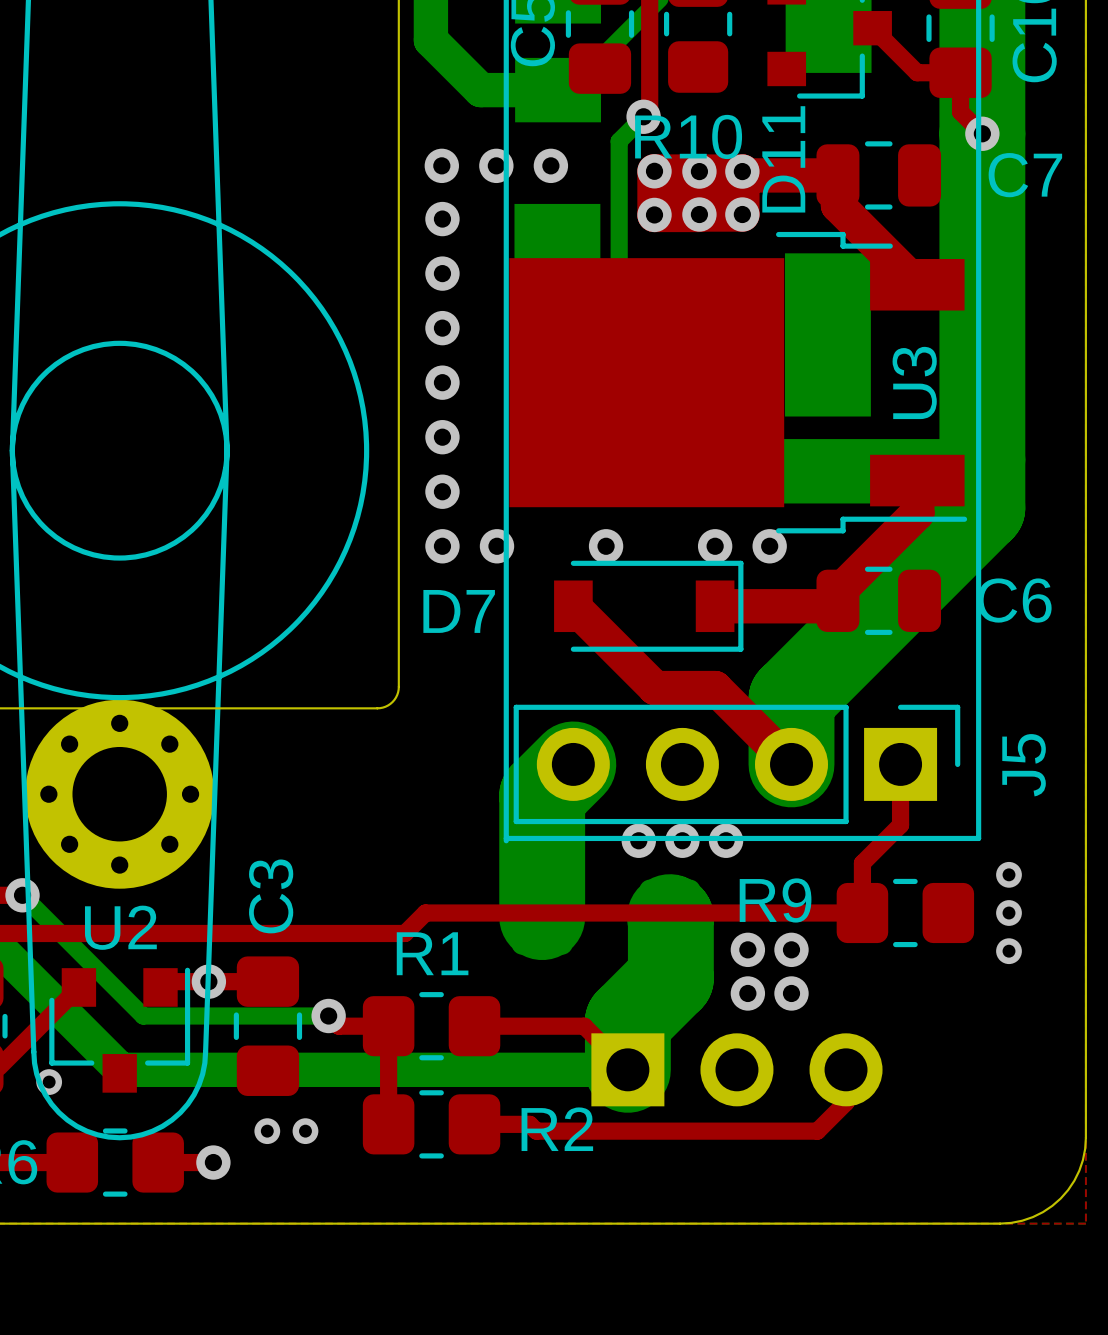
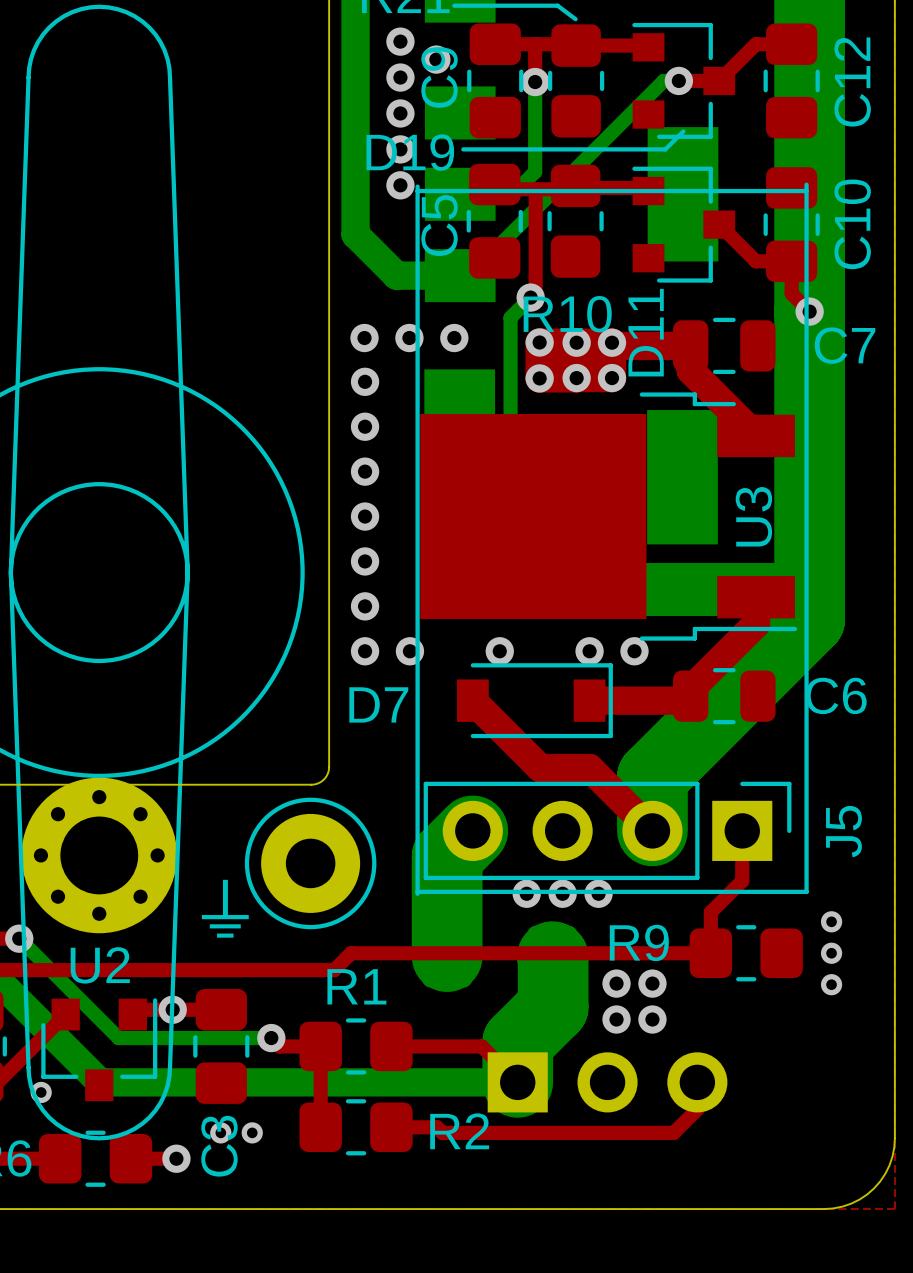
part: none -> (310, 863)
text: none -> ⏚ (225, 908)
C3 name position: C3 (271, 896) -> C3 (219, 1146)

